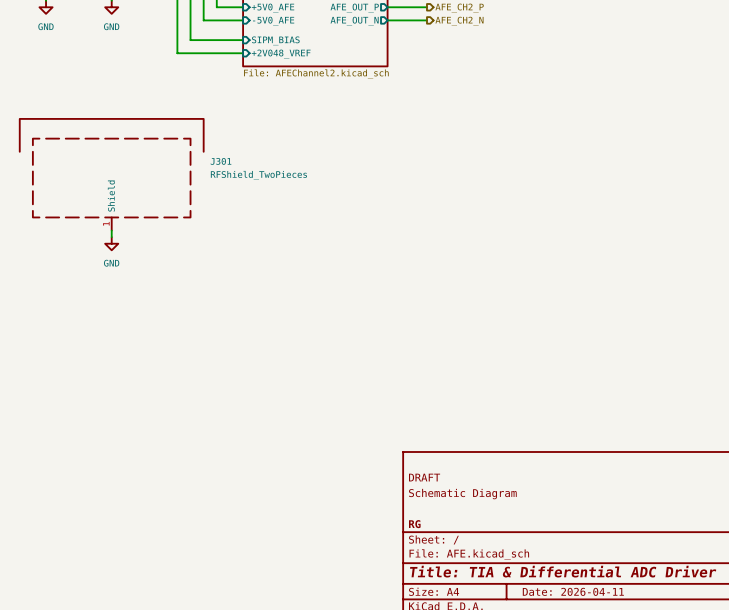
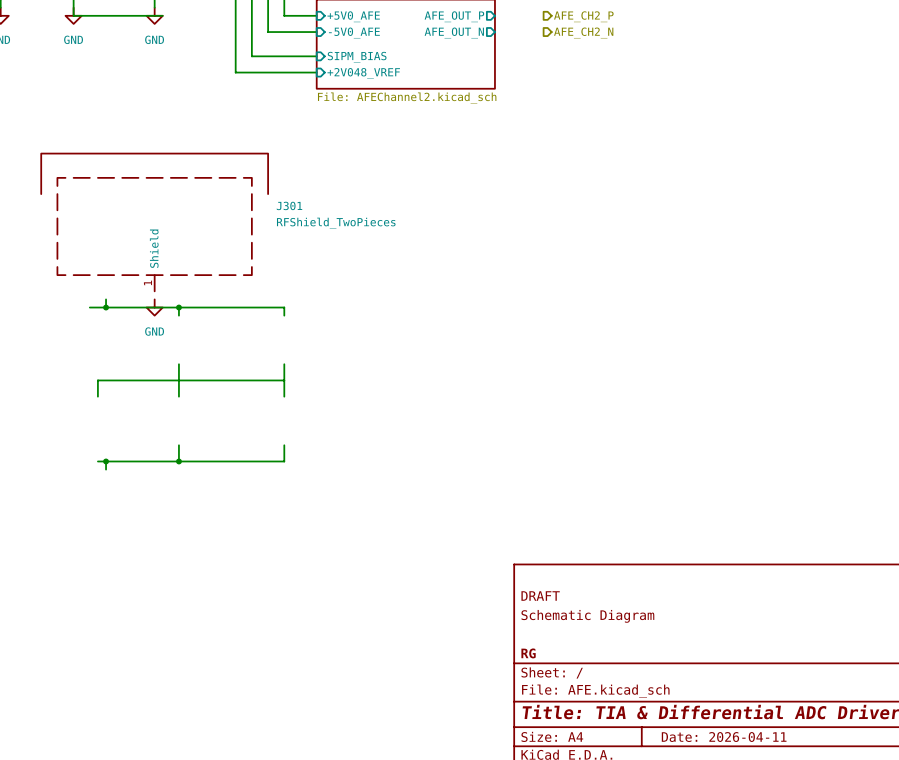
wire: none -> (73, 7) (73, 15) (162, 15)
wire: (387, 7) (426, 7) -> none
wire: (387, 20) (426, 20) -> none
wire: (111, 230) (111, 237) -> (178, 307) (178, 315)
wire: none -> (106, 299) (106, 307)
wire: none -> (89, 307) (284, 307) (284, 315)
junction: none -> (106, 307)
junction: none -> (178, 307)
wire: none -> (178, 364) (178, 396)
wire: none -> (284, 364) (284, 396)
wire: none -> (284, 380) (97, 380) (97, 396)
wire: none -> (178, 445) (178, 461)
wire: none -> (284, 445) (284, 461) (97, 461)
wire: none -> (106, 461) (106, 469)
junction: none -> (106, 461)
junction: none -> (178, 461)

